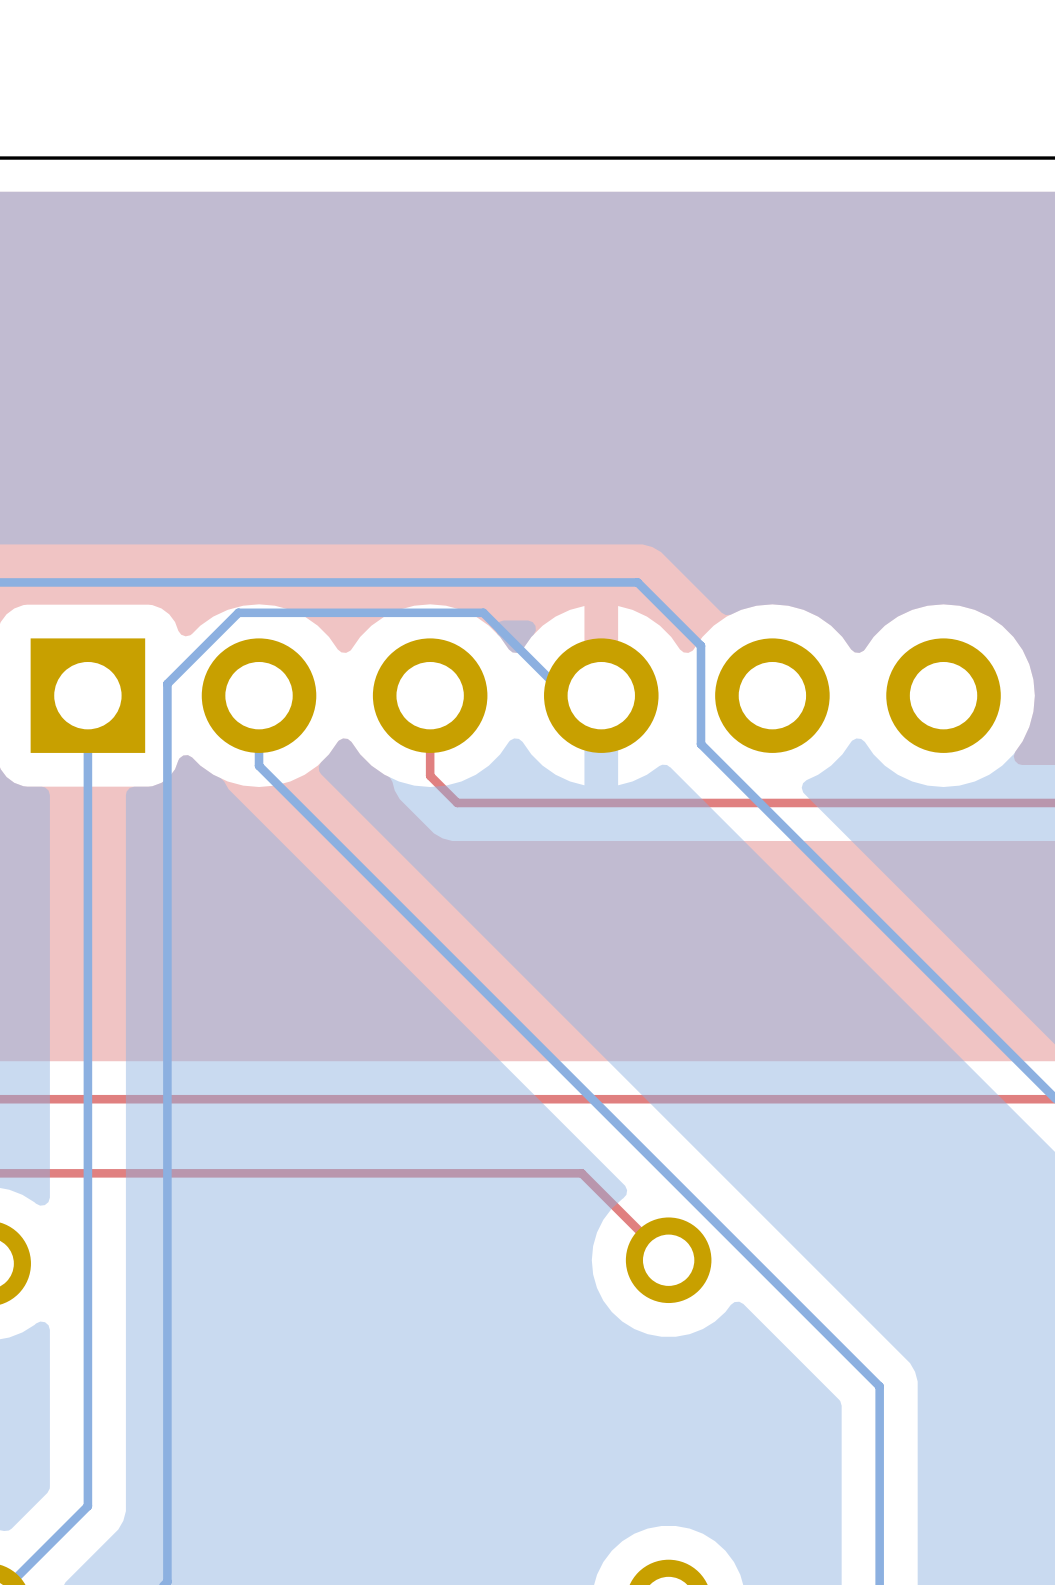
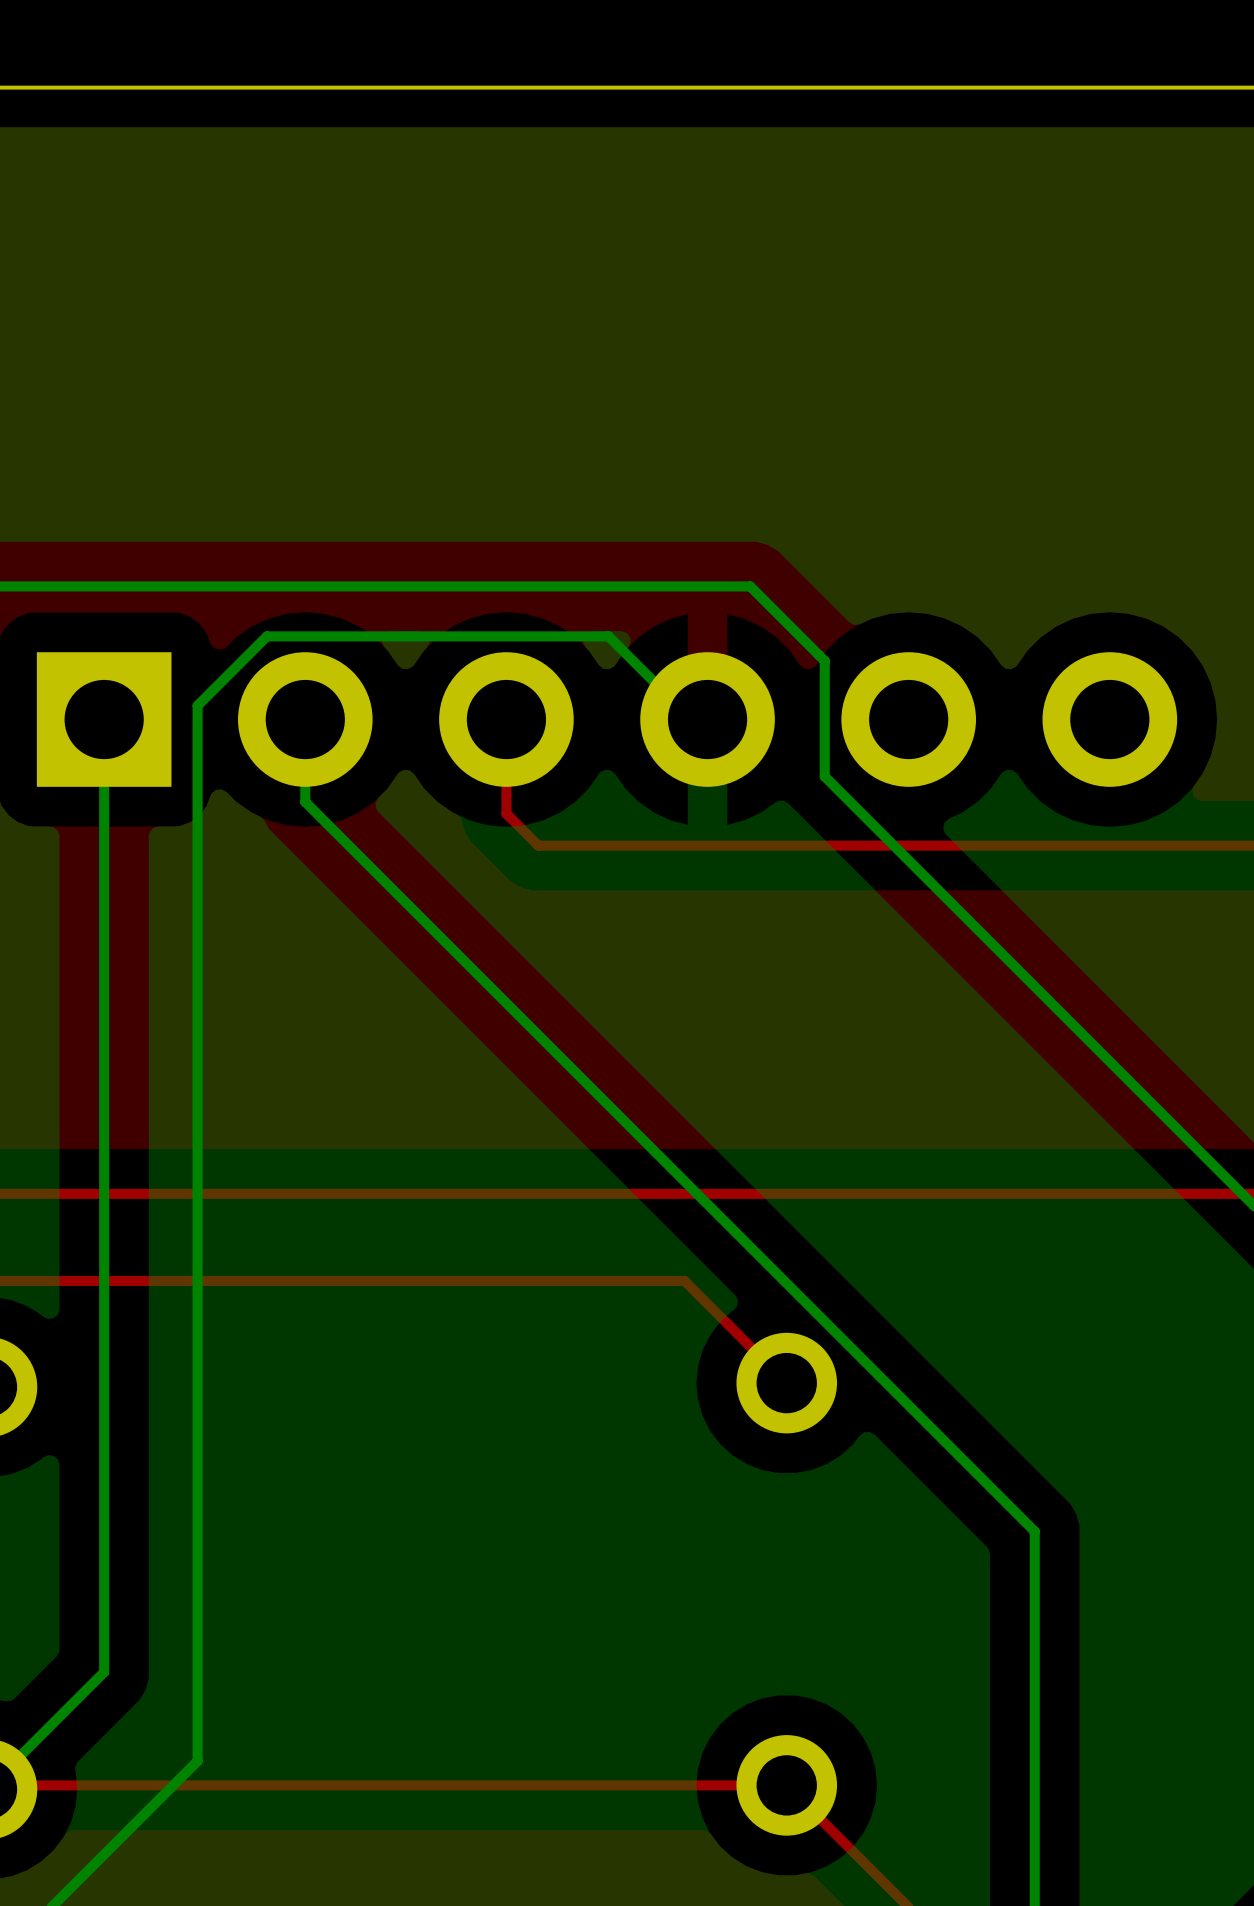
bottom track: (226, 624) (238, 612) (483, 612) (566, 695) (587, 695) -> (266, 636) (608, 636) (691, 719)

